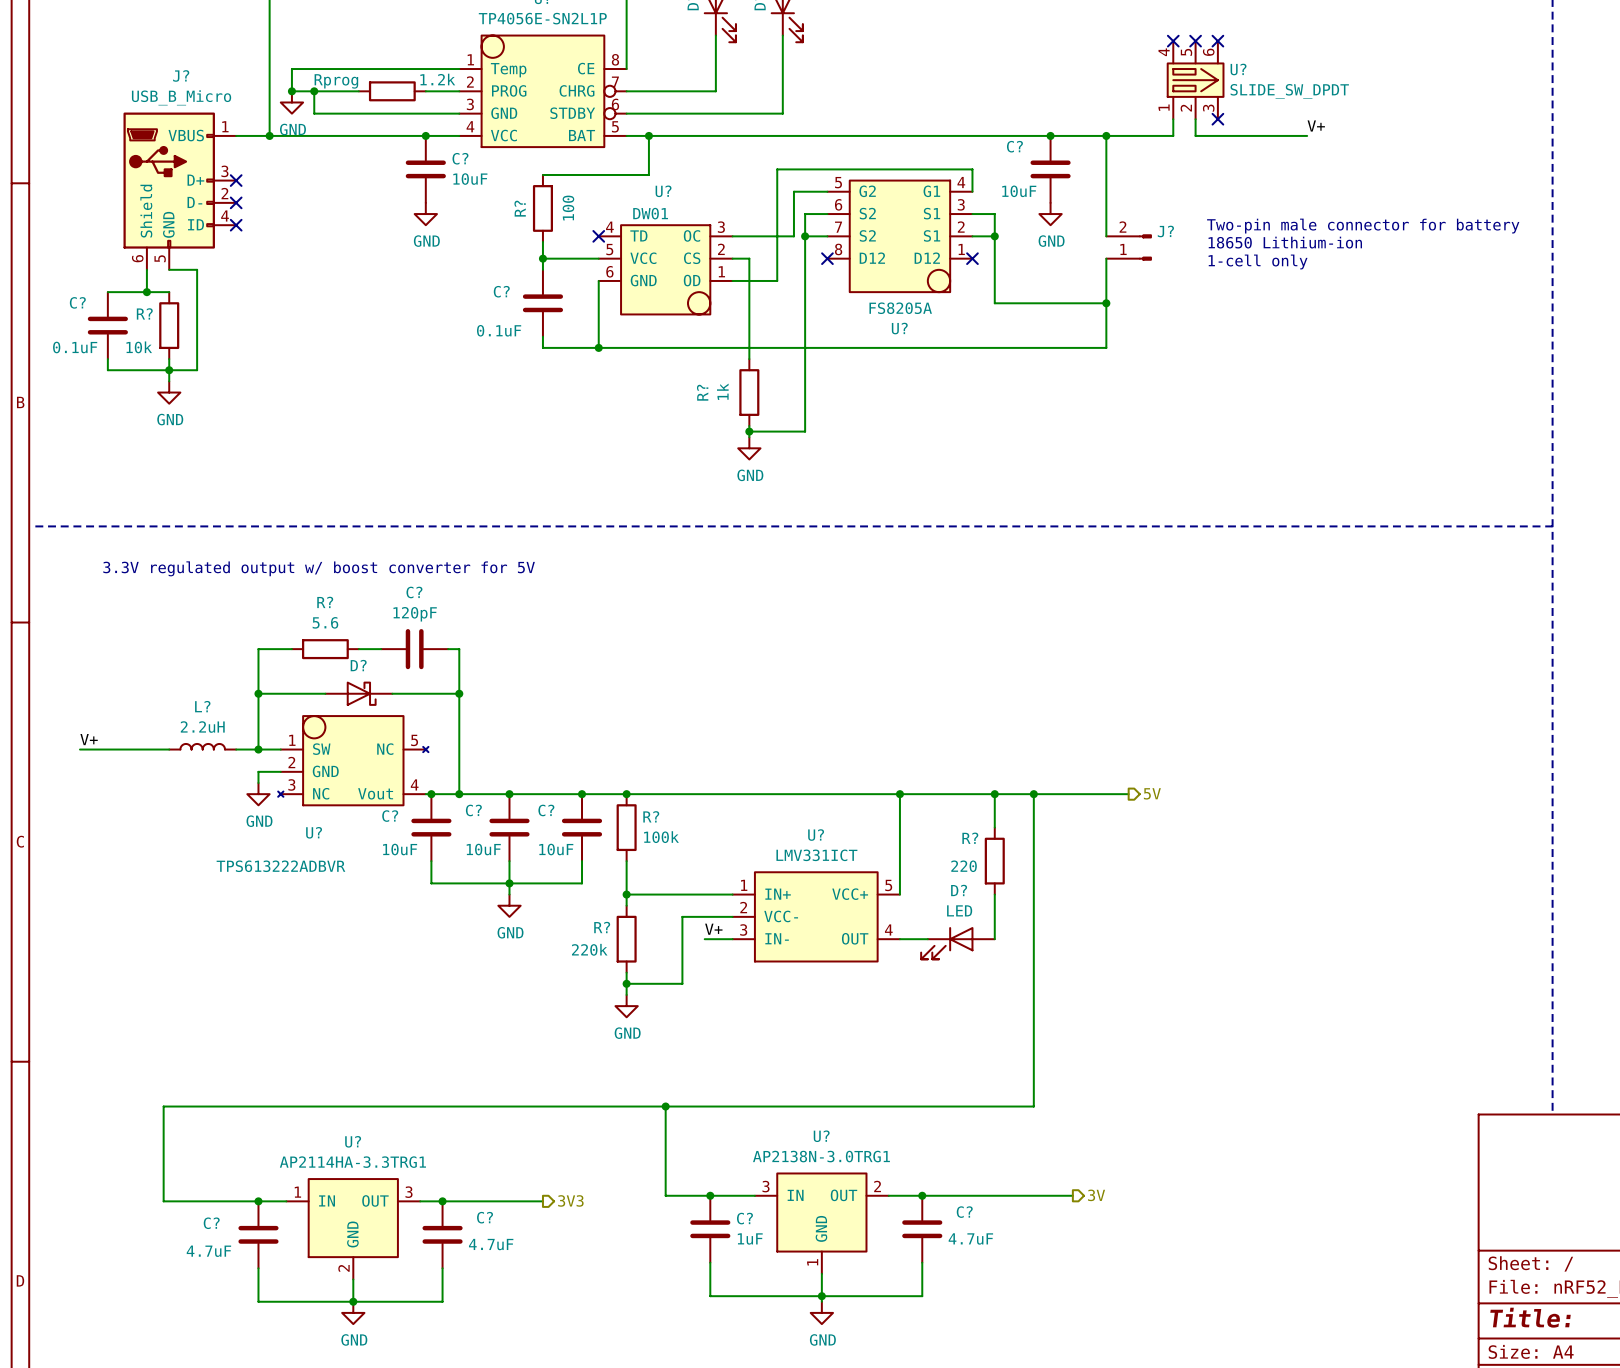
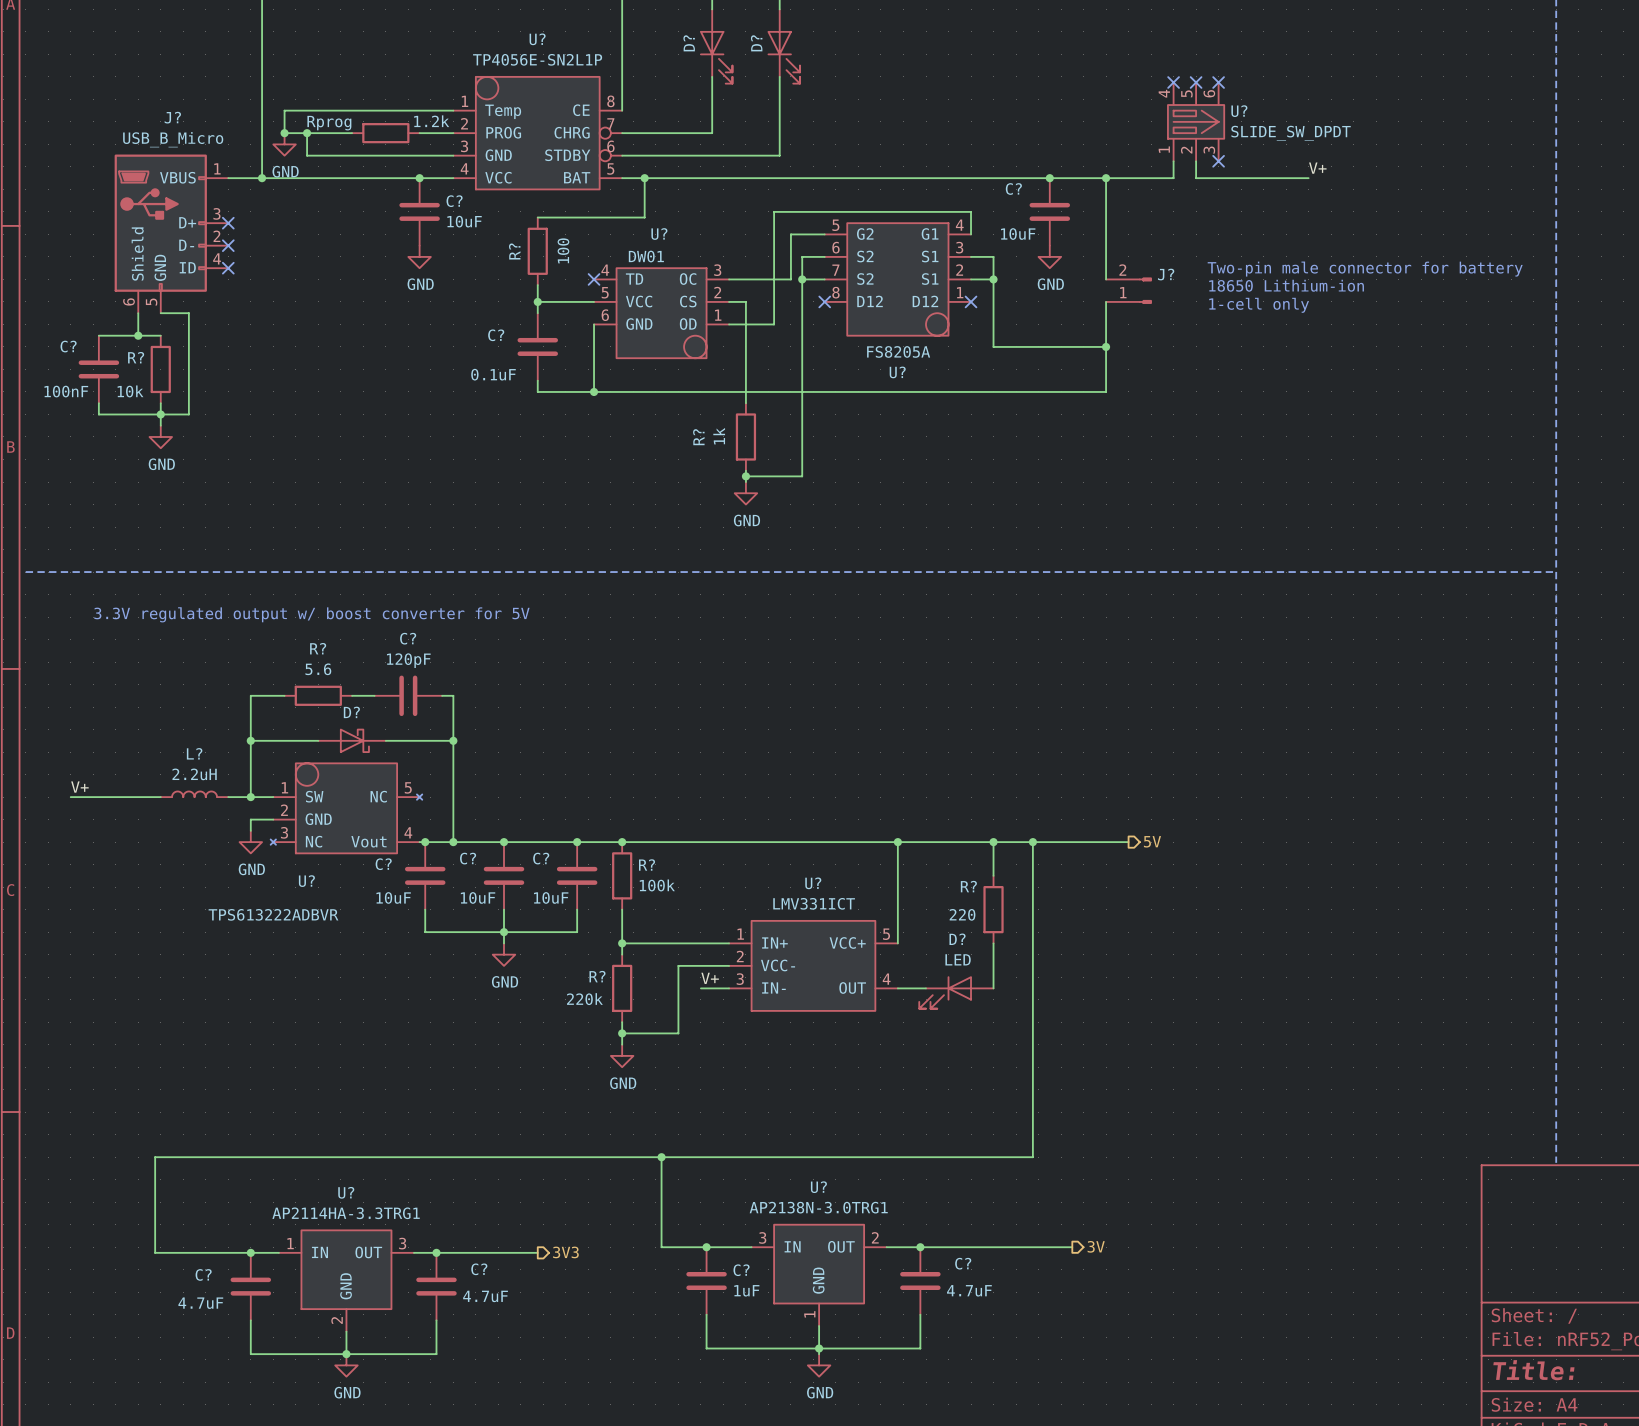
C? value: 0.1uF (75, 347) -> 100nF (66, 391)

